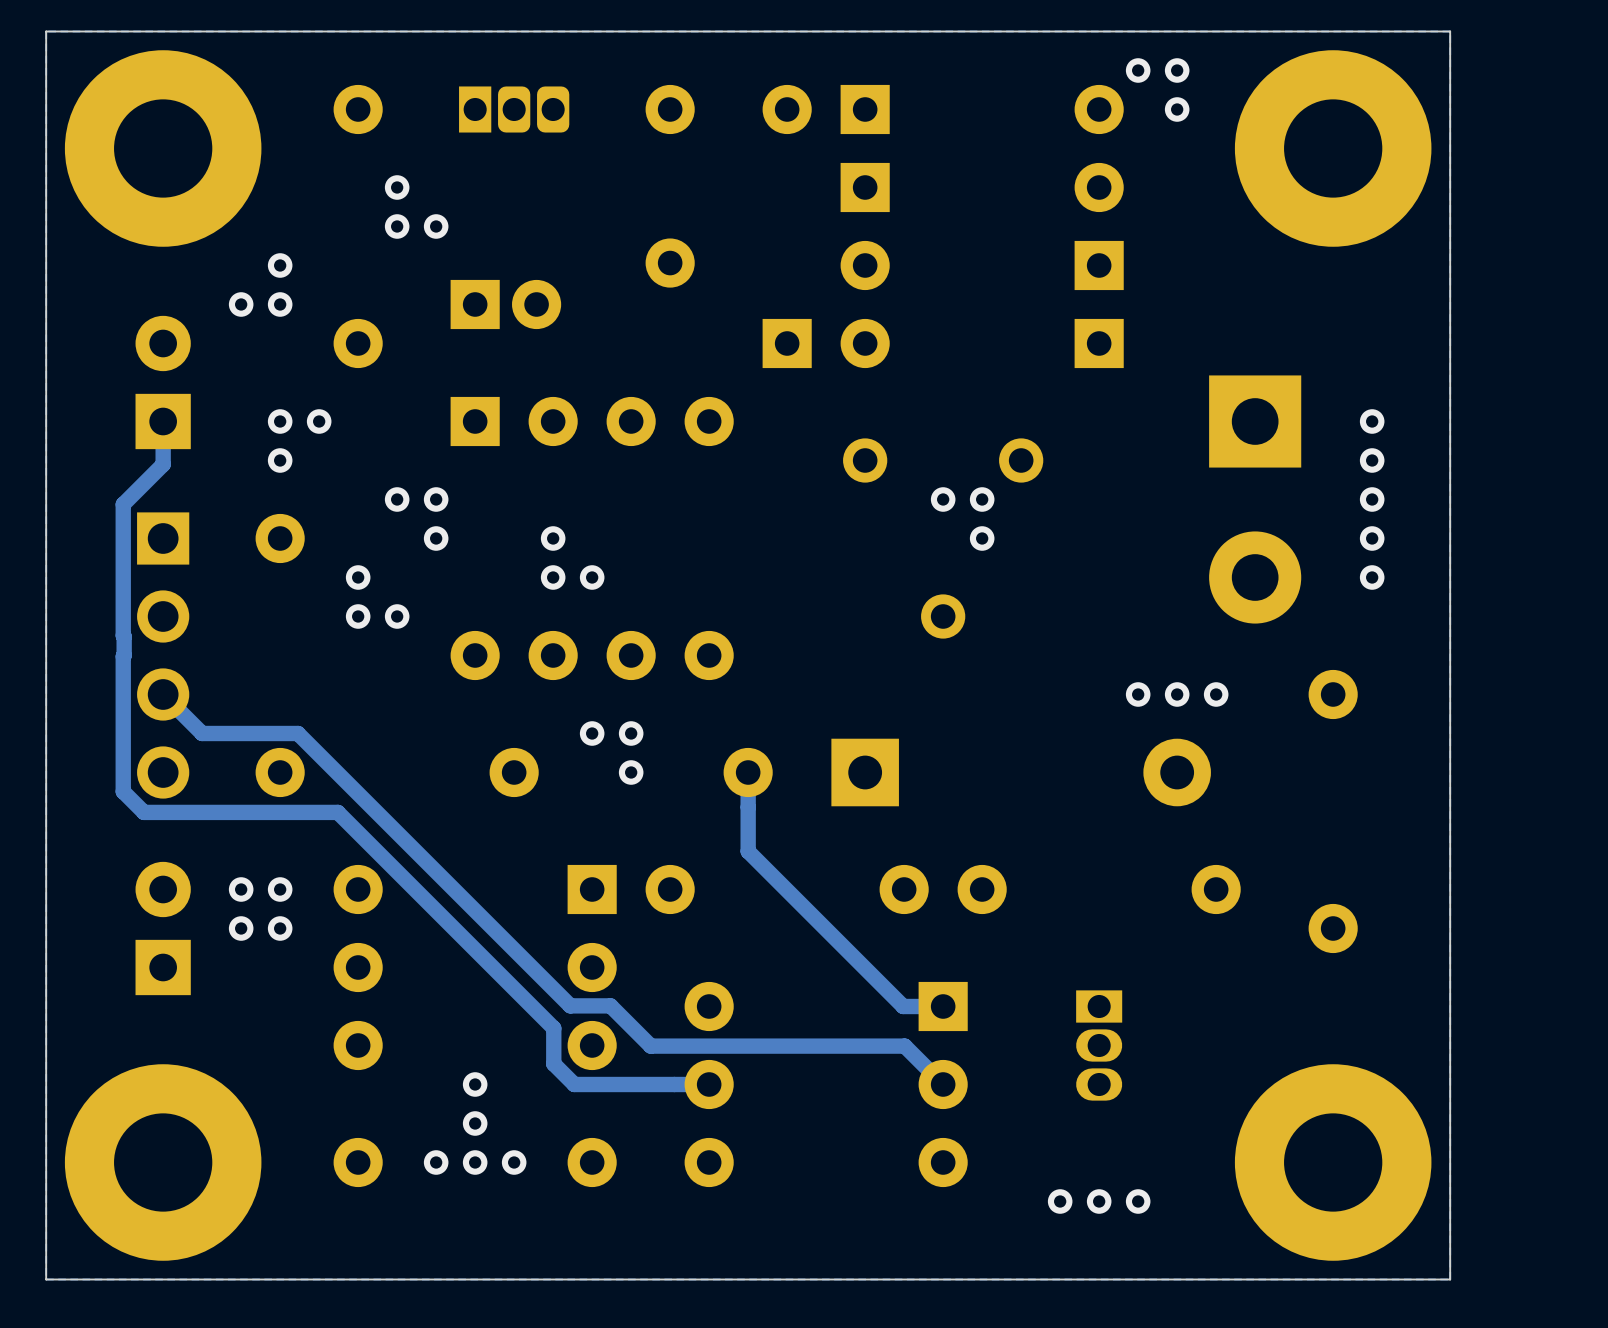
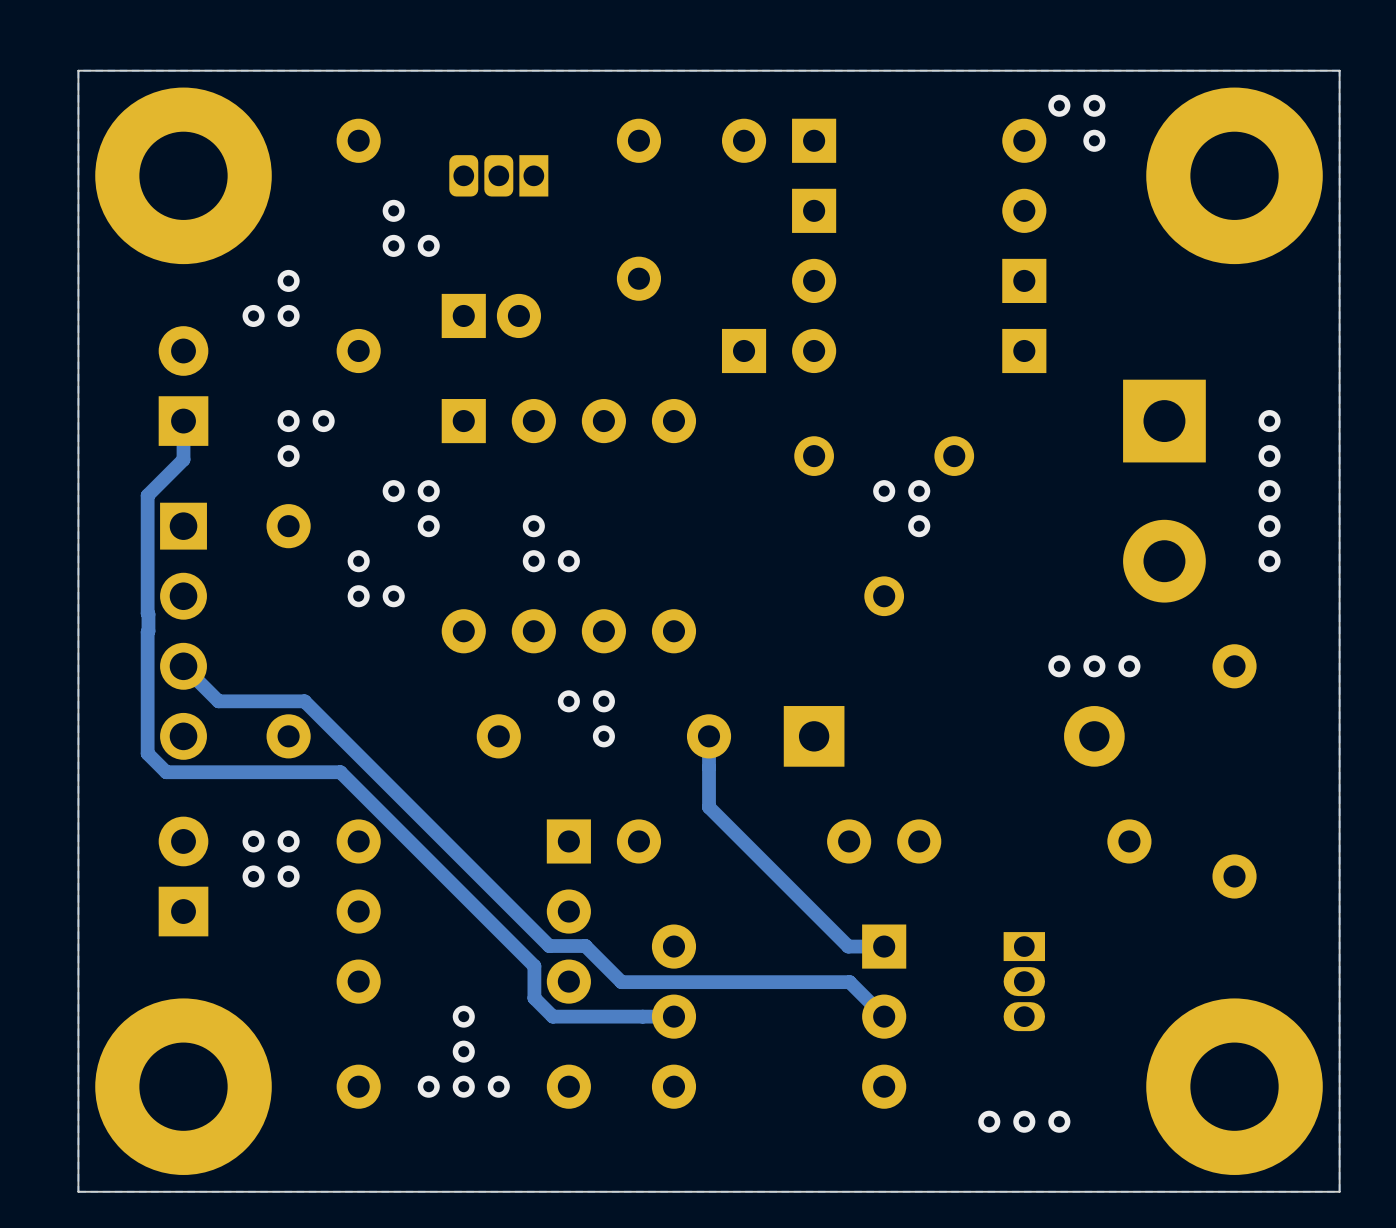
part rotation: 0° (514, 109) -> 180° (498, 175)

